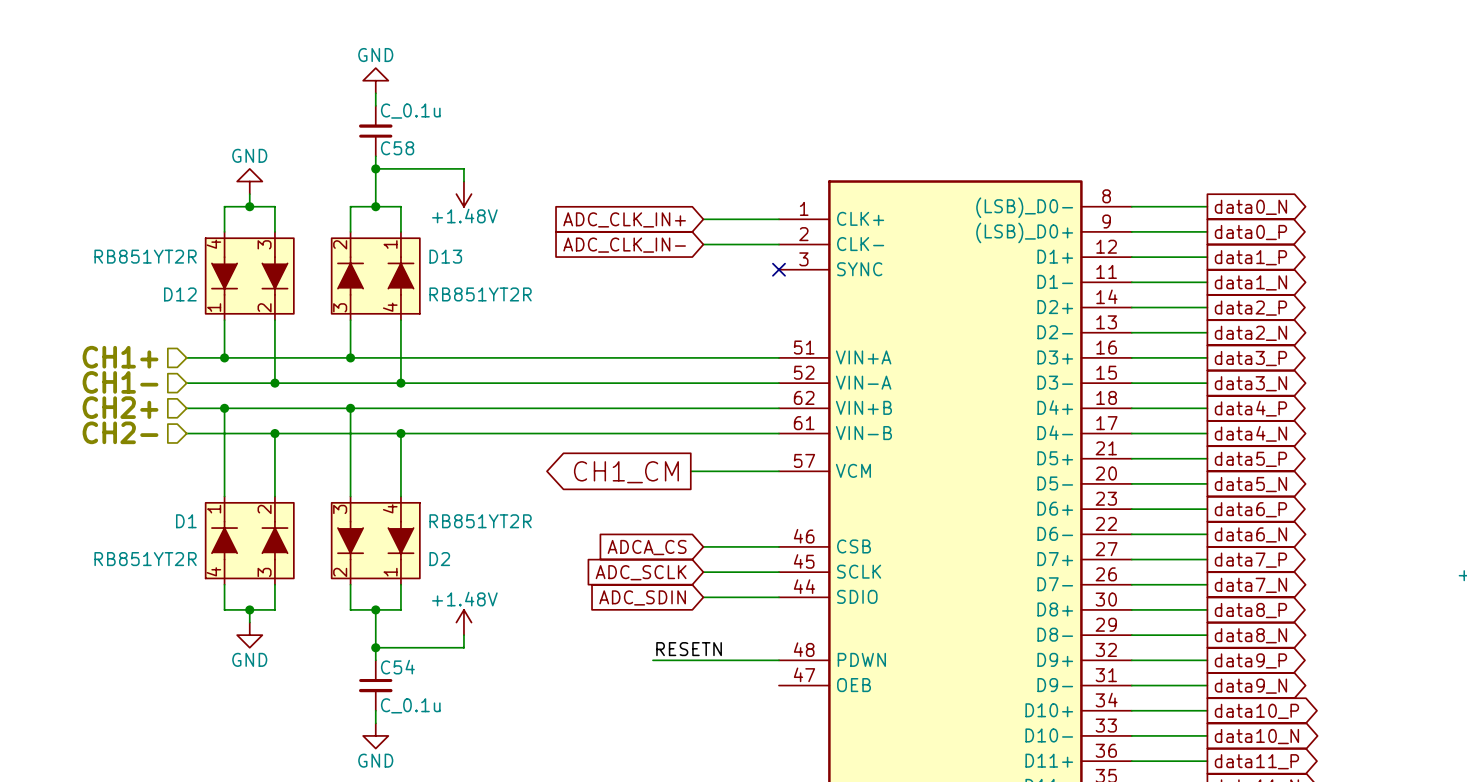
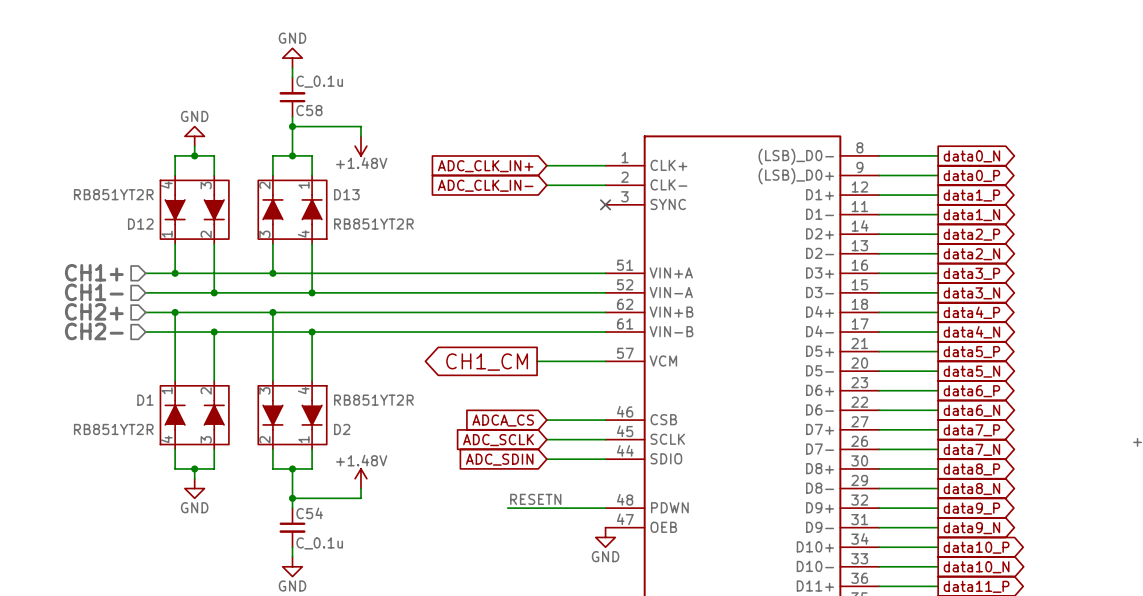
power symbol: none -> GND (605, 537)

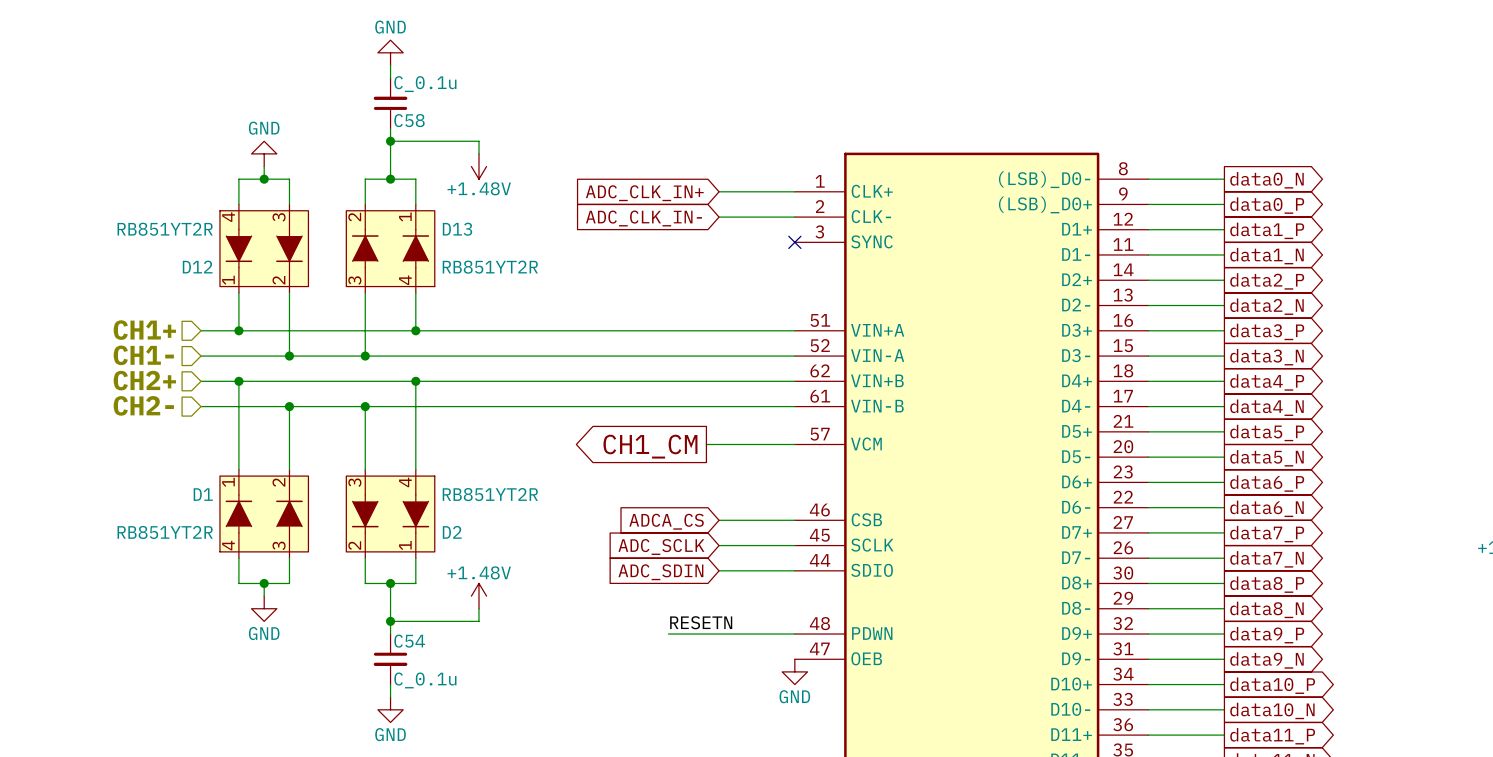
junction: (272, 273) -> none
wire: (312, 273) (312, 292) -> (415, 381) (415, 406)
junction: none -> (415, 330)
junction: none -> (365, 356)
junction: (312, 292) -> none
wire: (272, 312) (272, 332) -> (365, 330) (365, 356)
junction: (272, 312) -> none
junction: none -> (415, 381)
junction: none -> (365, 406)
junction: (312, 332) -> none

